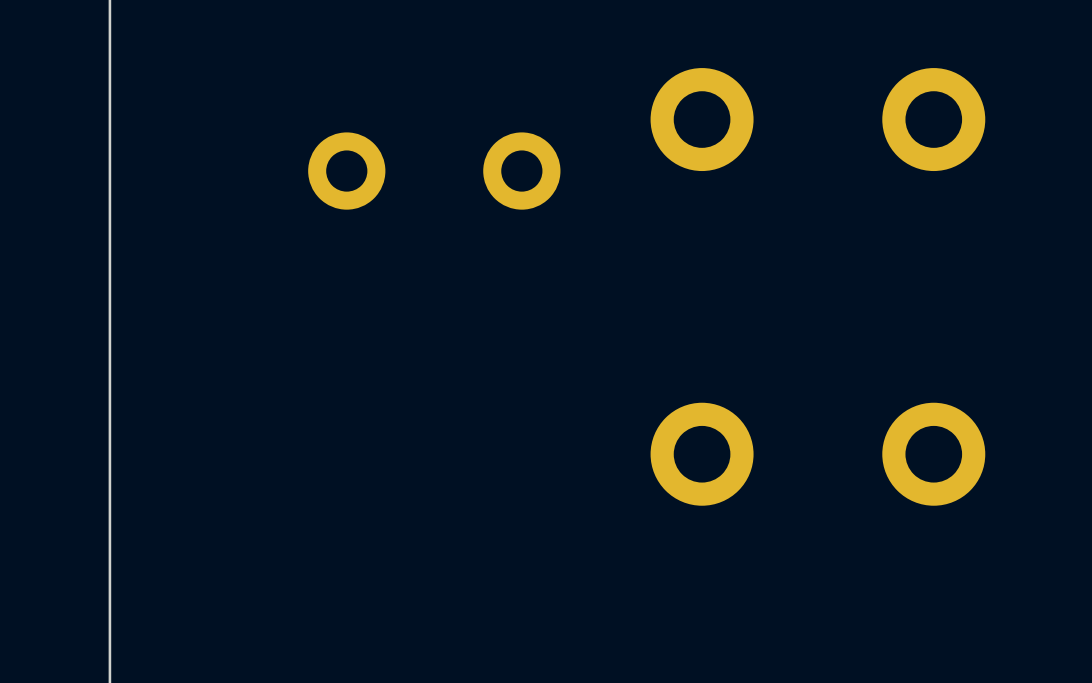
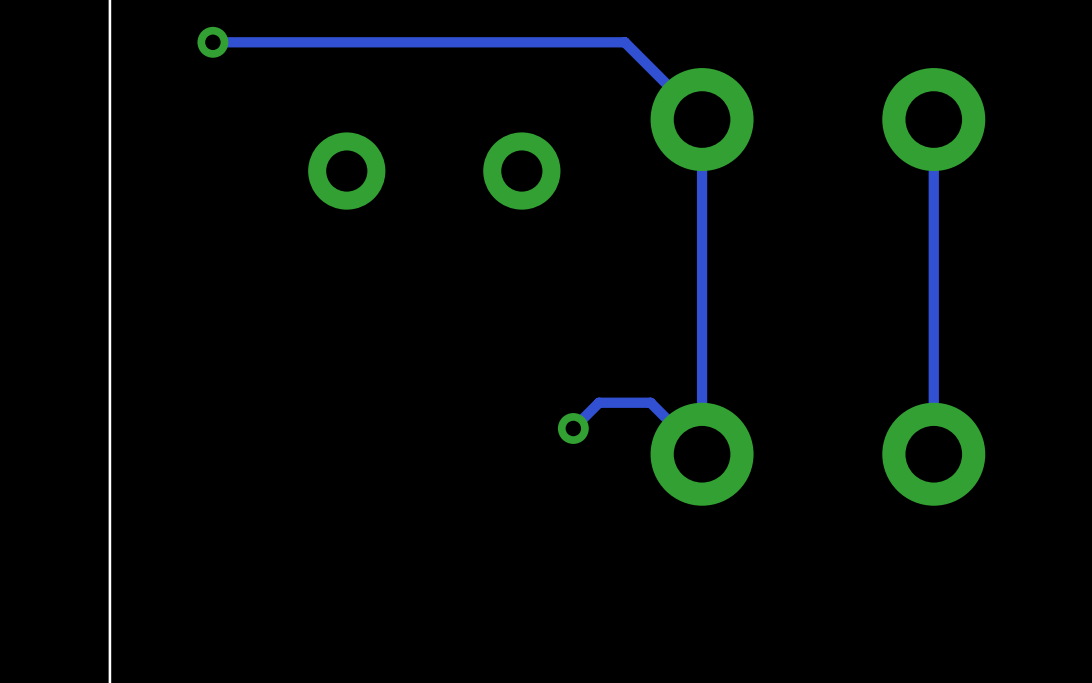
track: none -> (212, 42) (624, 42) (702, 119) (702, 454) (650, 402) (599, 402) (573, 428)
via: none -> (212, 42)
track: none -> (933, 119) (933, 454)
via: none -> (573, 428)

